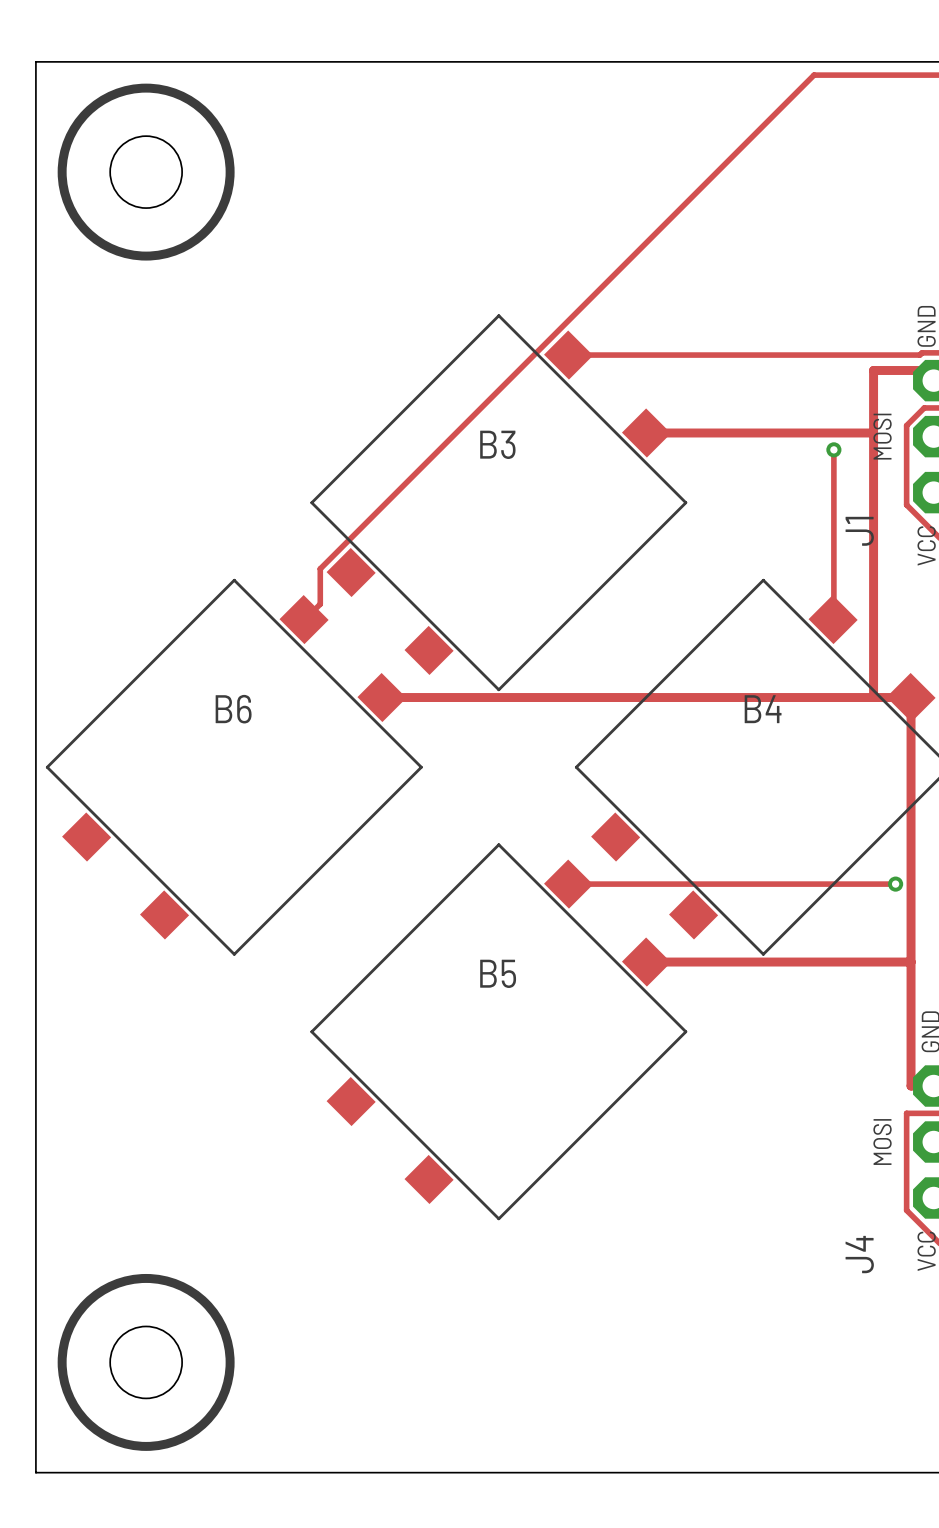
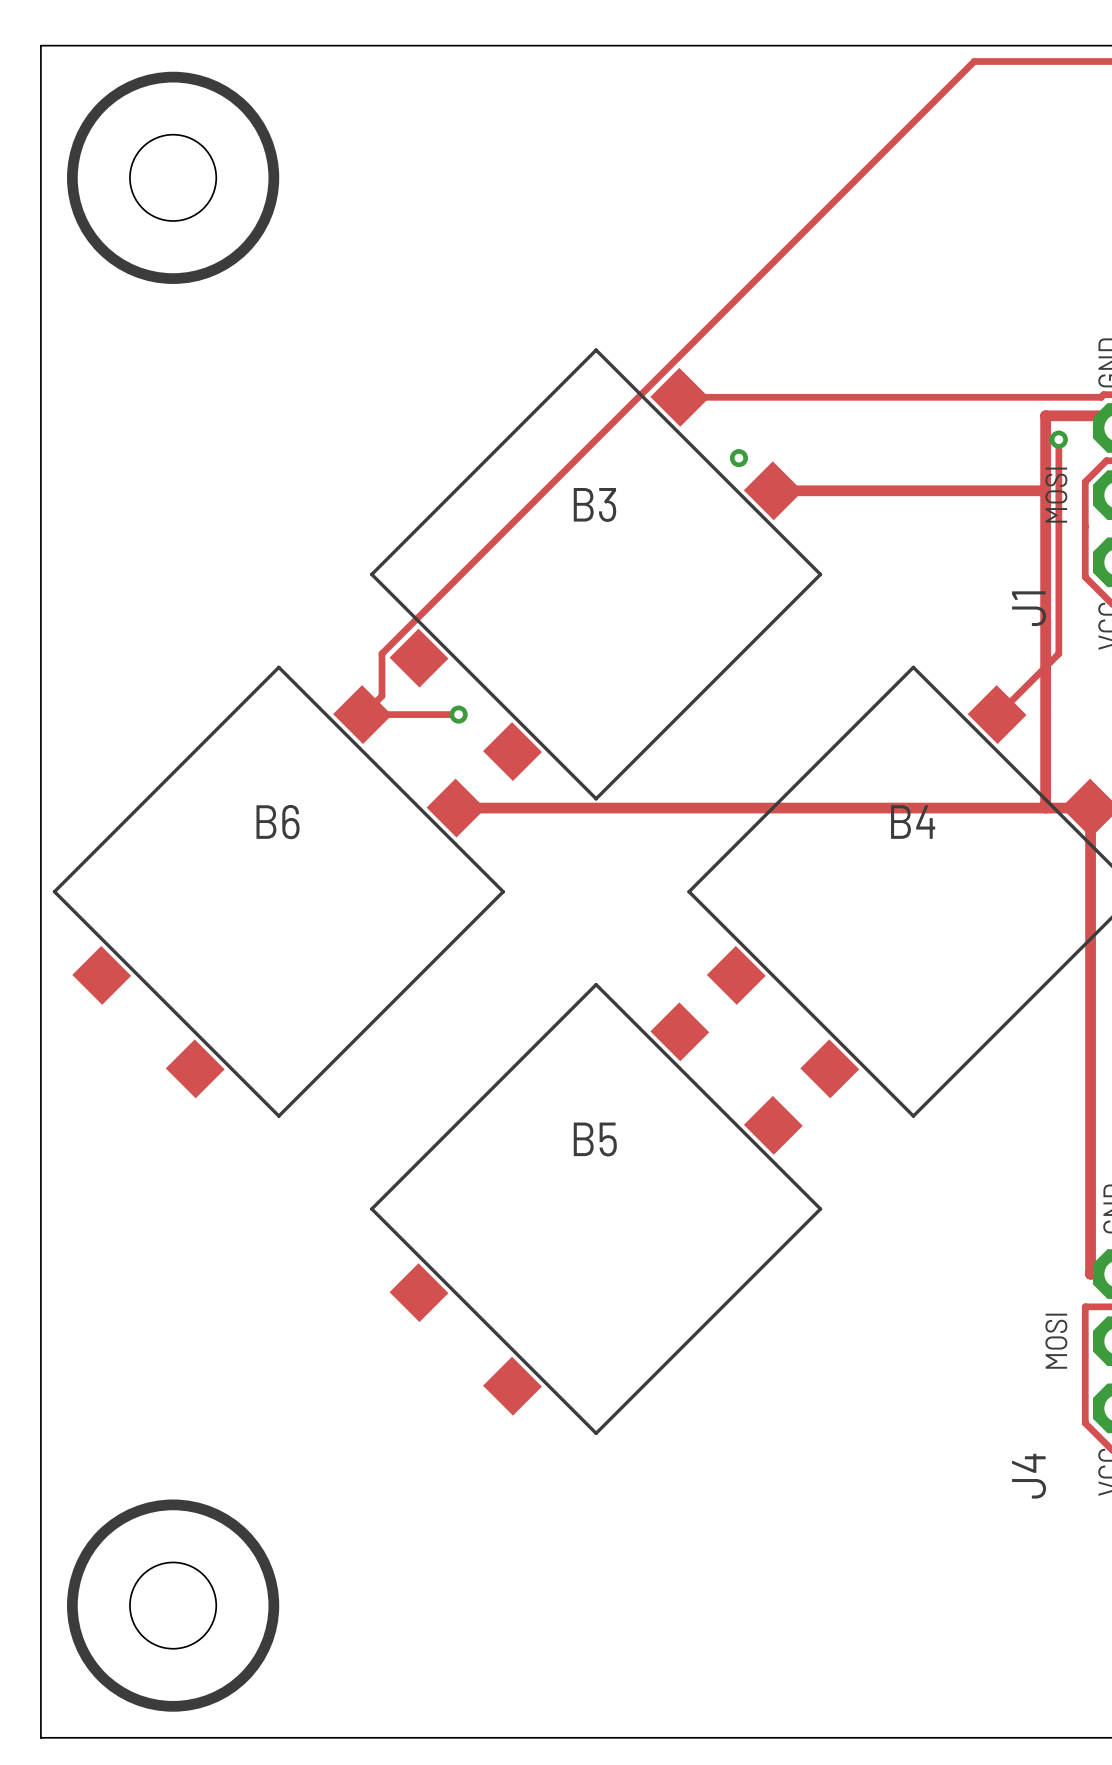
via: none -> (738, 458)
track: (833, 449) (833, 619) -> (1058, 439) (1058, 653) (998, 714)
via position: (833, 449) -> (1058, 439)
track: none -> (363, 714) (458, 714)
via: none -> (458, 714)
track: (569, 884) (895, 884) -> none
via: (895, 884) -> none
track: (646, 962) (911, 962) -> none

